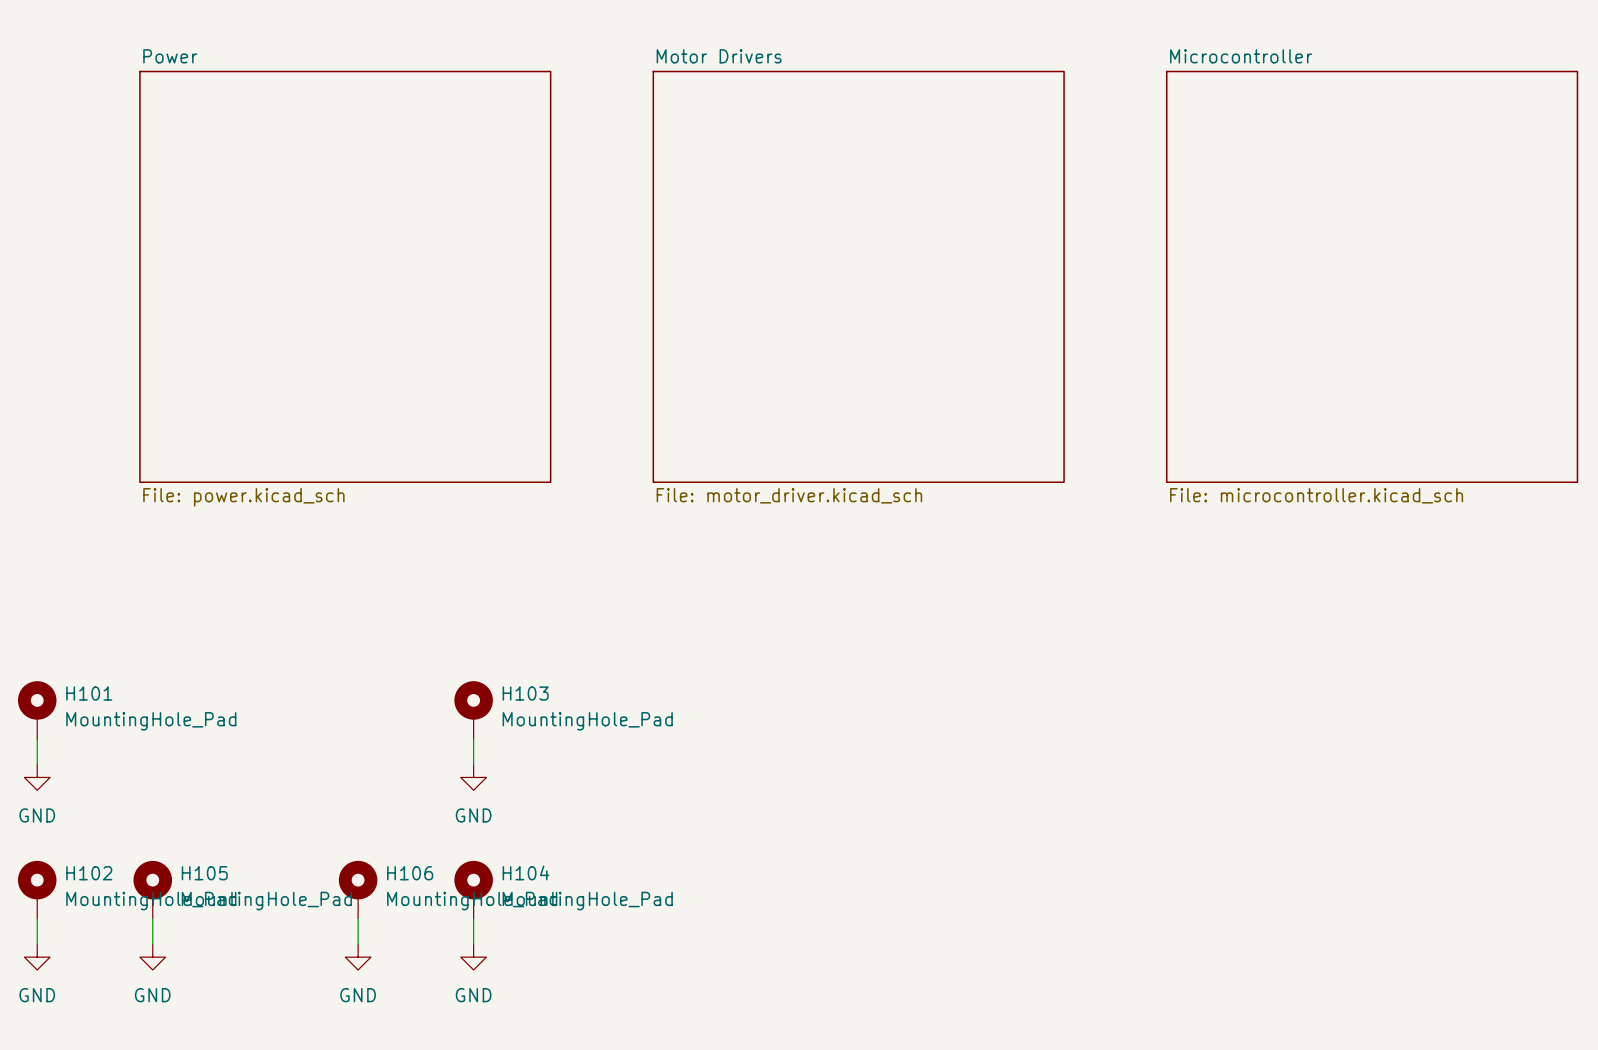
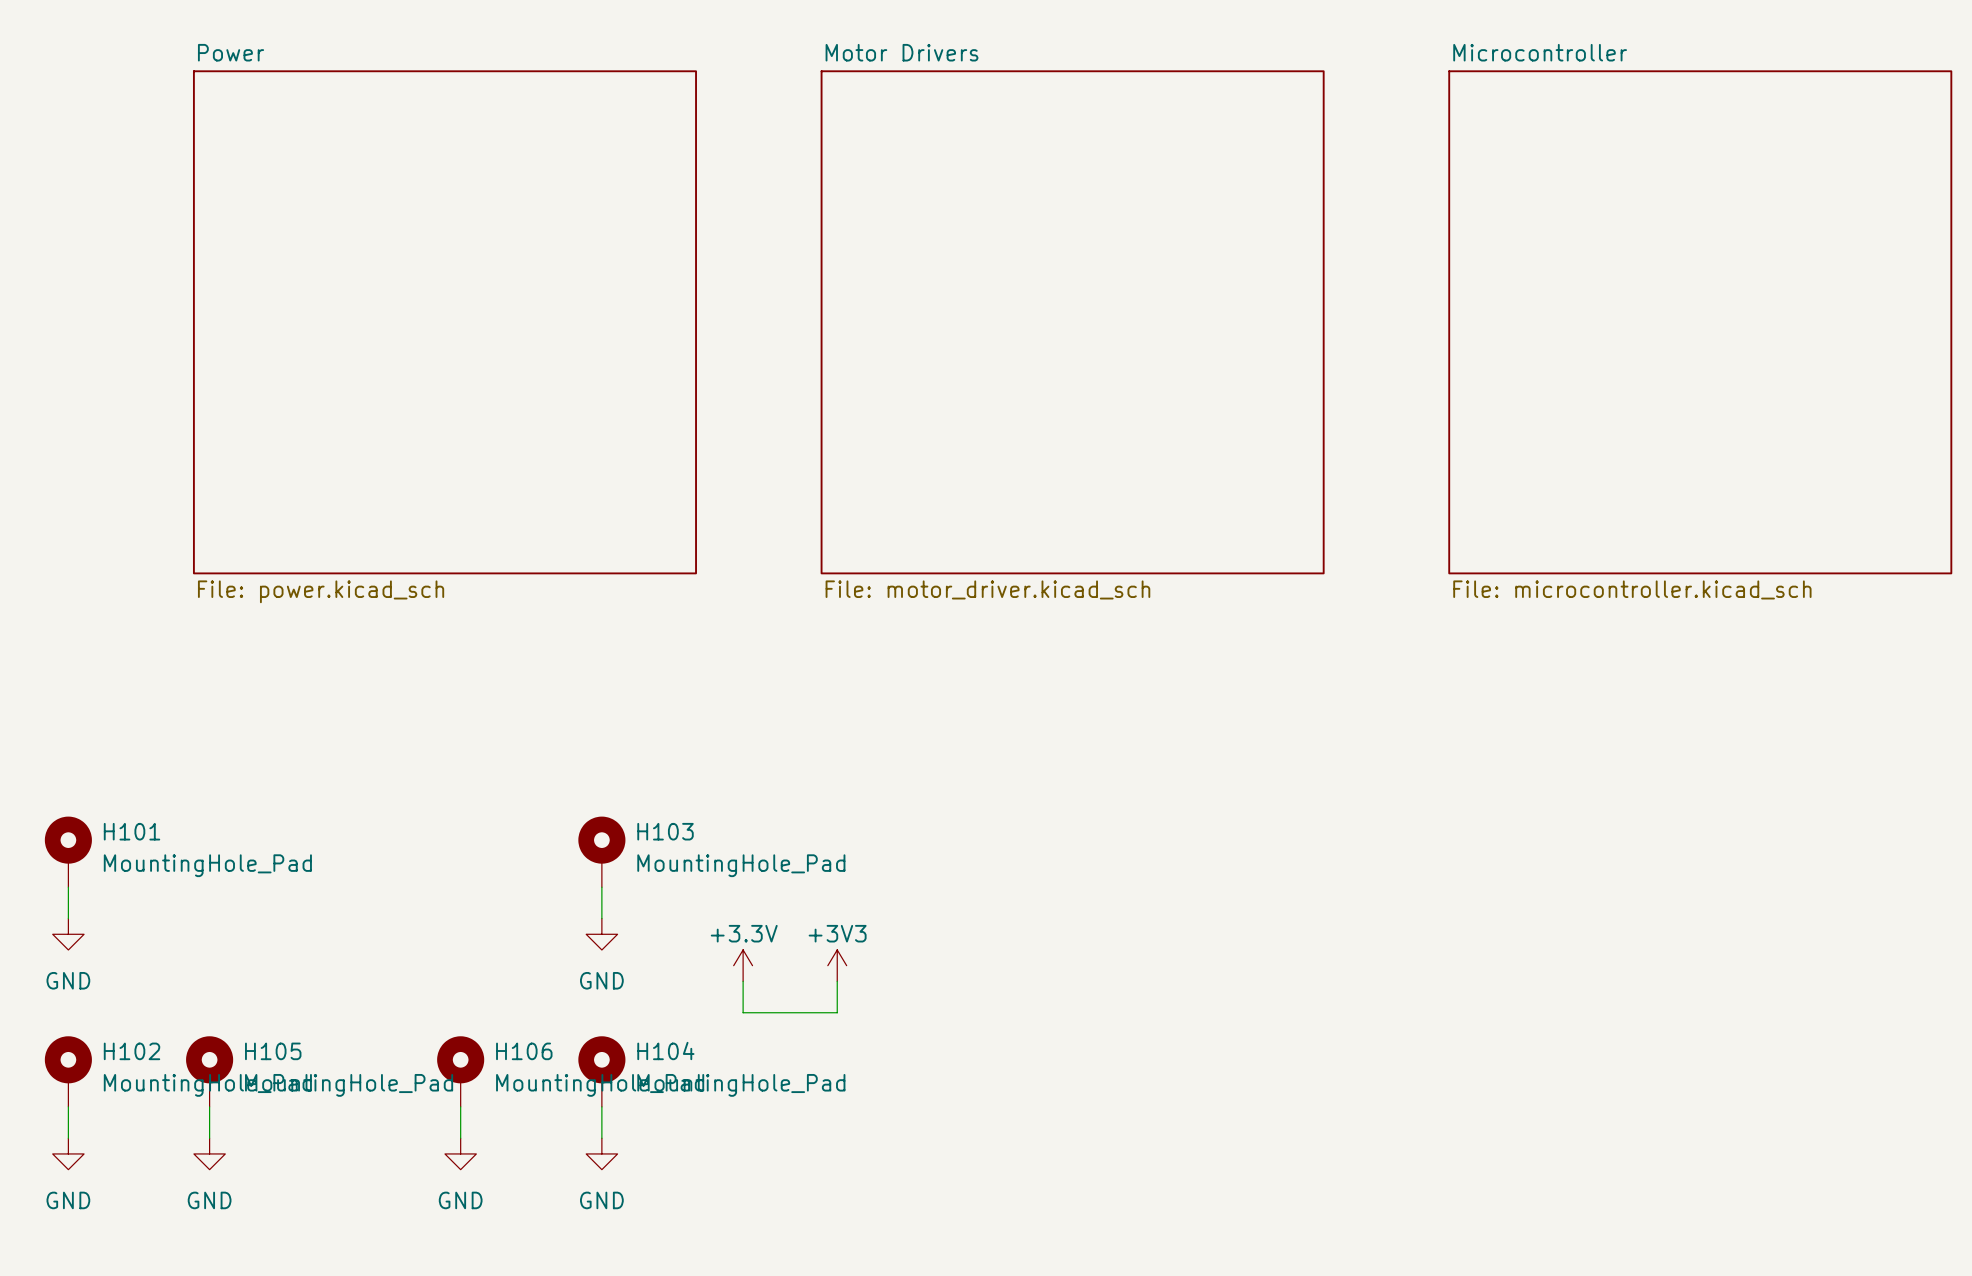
power symbol: none -> +3.3V (743, 965)
power symbol: none -> +3V3 (837, 965)
wire: none -> (743, 981) (743, 1012) (837, 1012) (837, 981)

